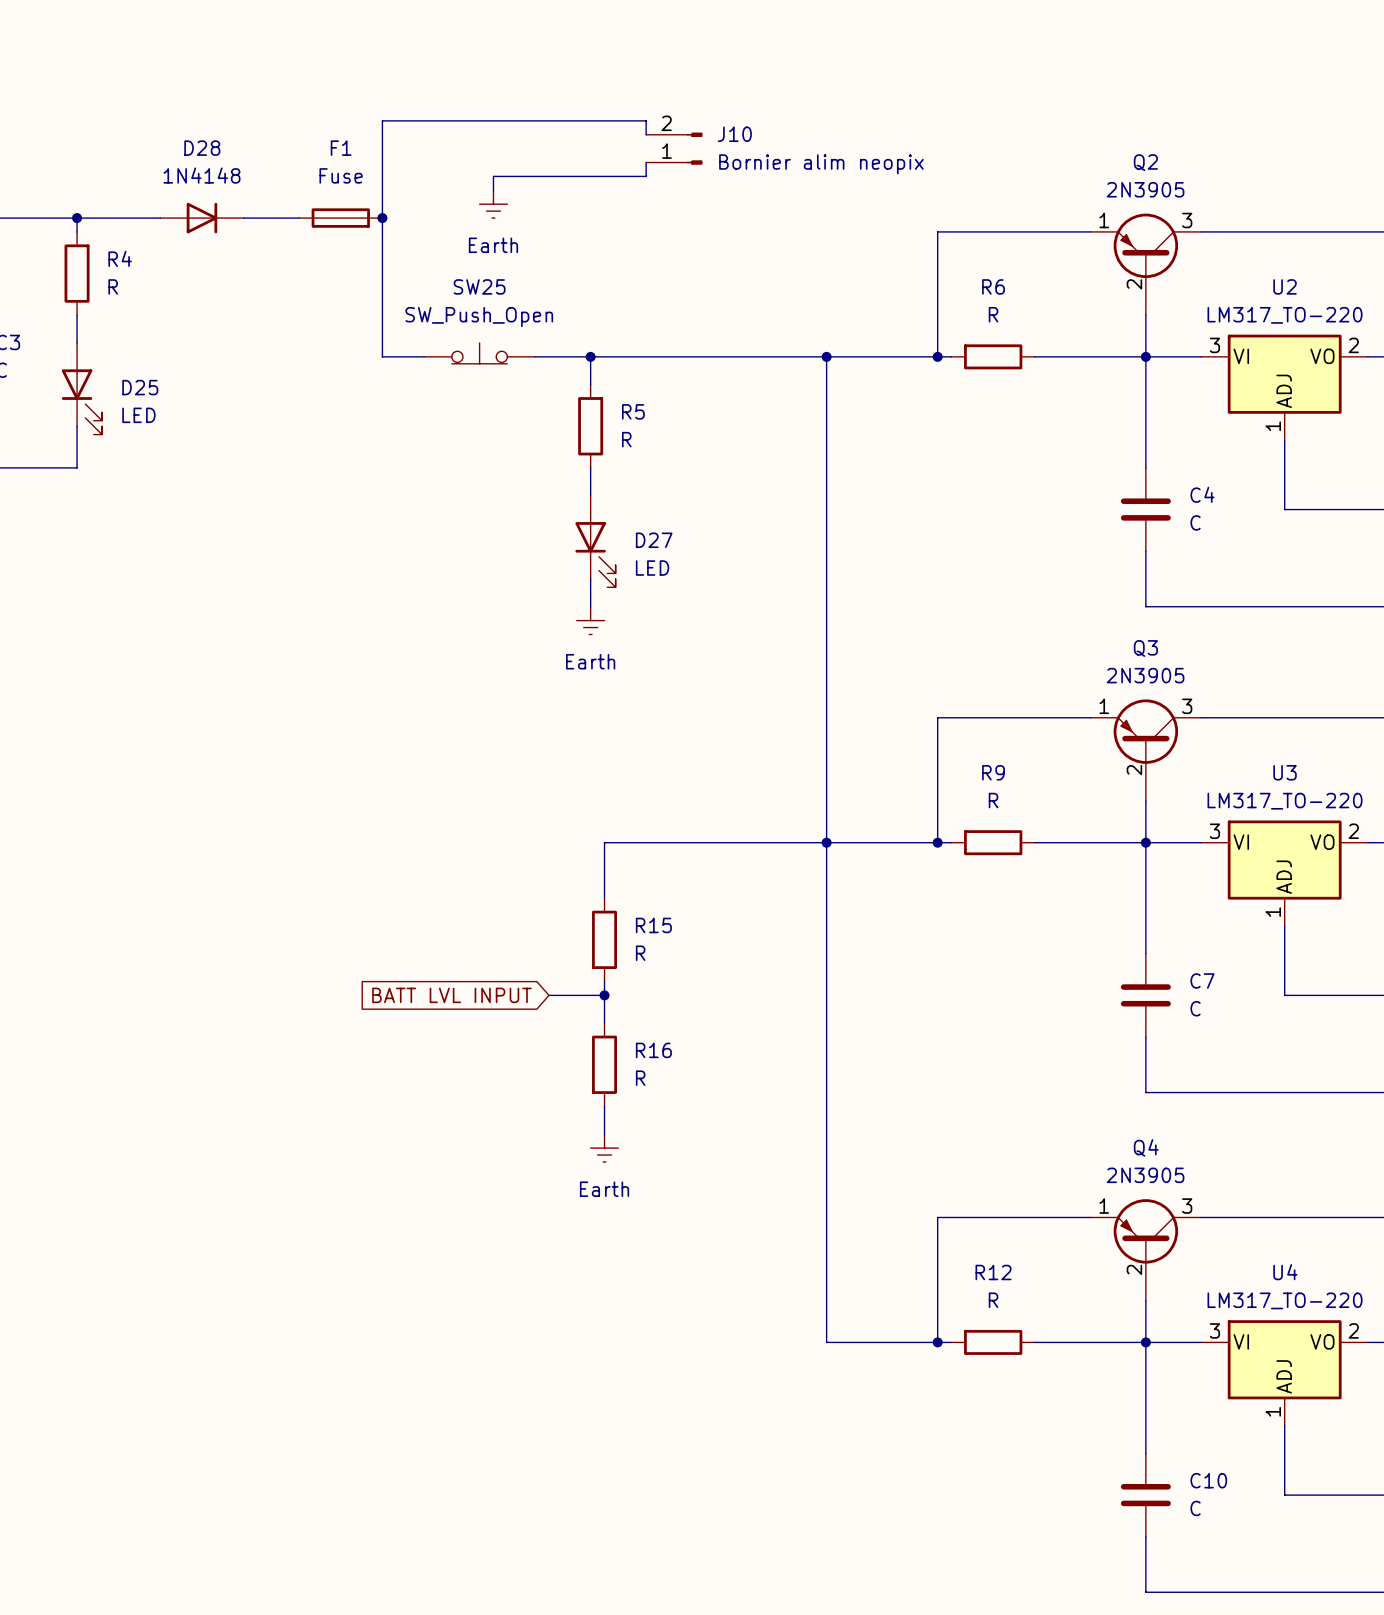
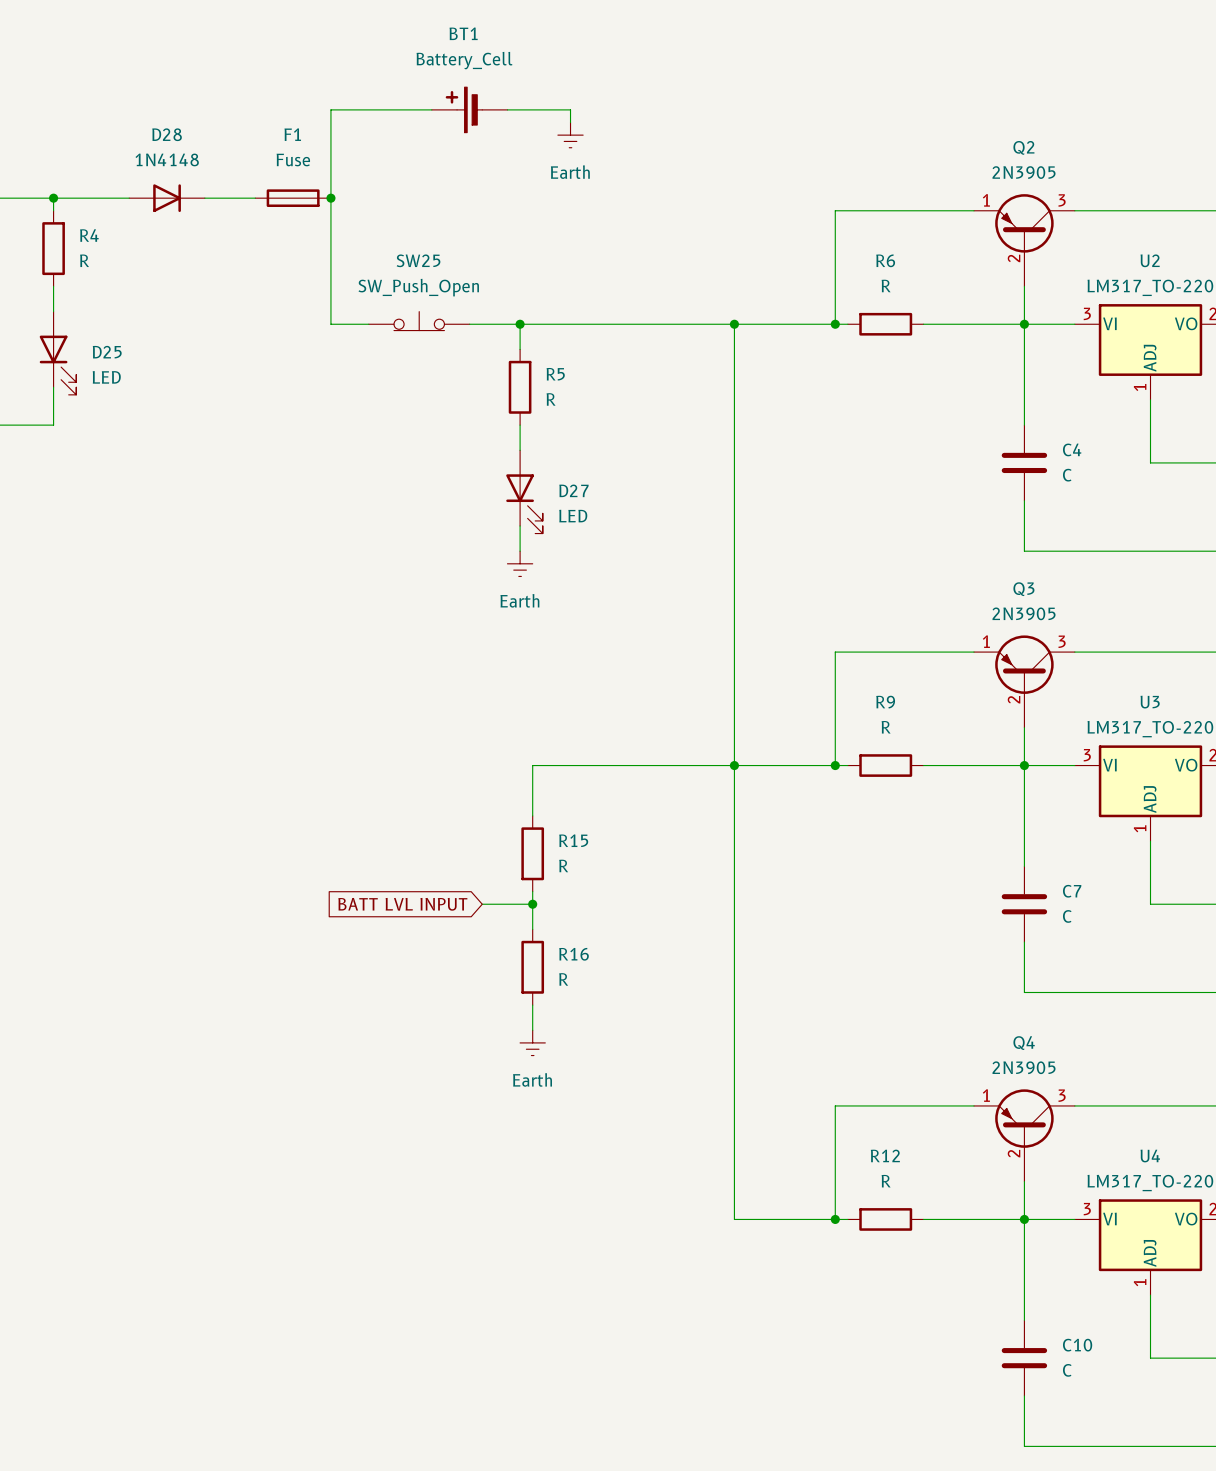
BT1: none -> Battery_Cell (469, 109)
J10: Bornier alim neopix (674, 148) -> none
wire: (646, 162) (646, 176) (493, 176) (493, 190) -> none
power symbol position: Earth (493, 204) -> Earth (570, 135)

